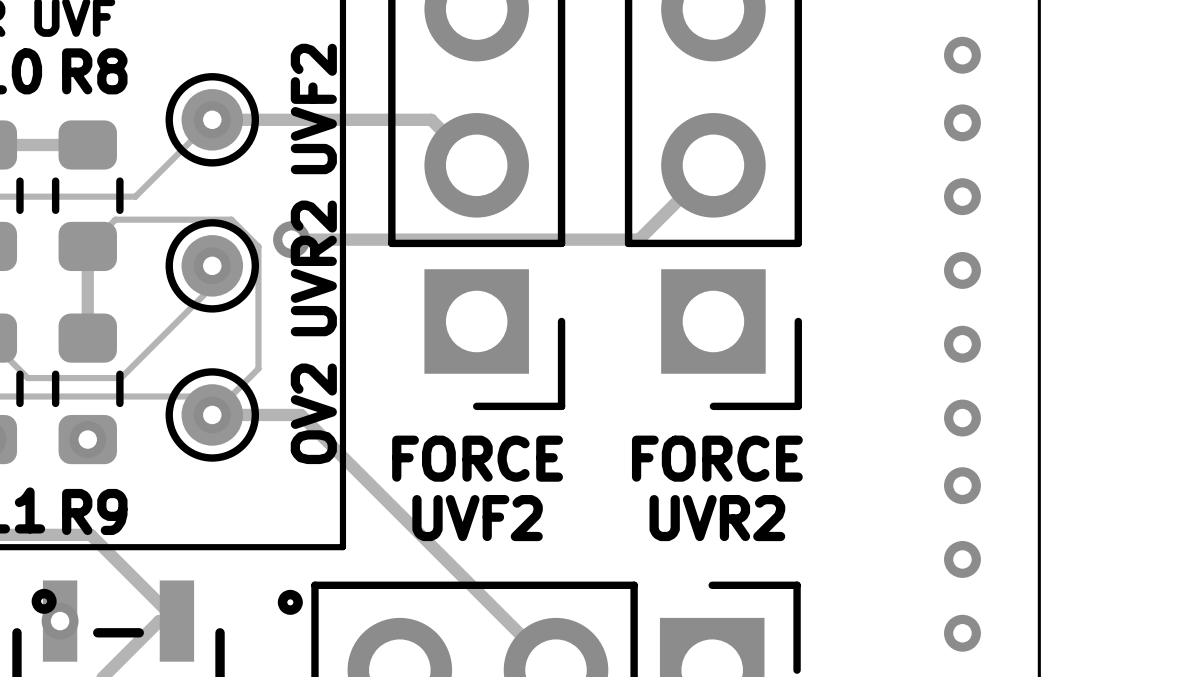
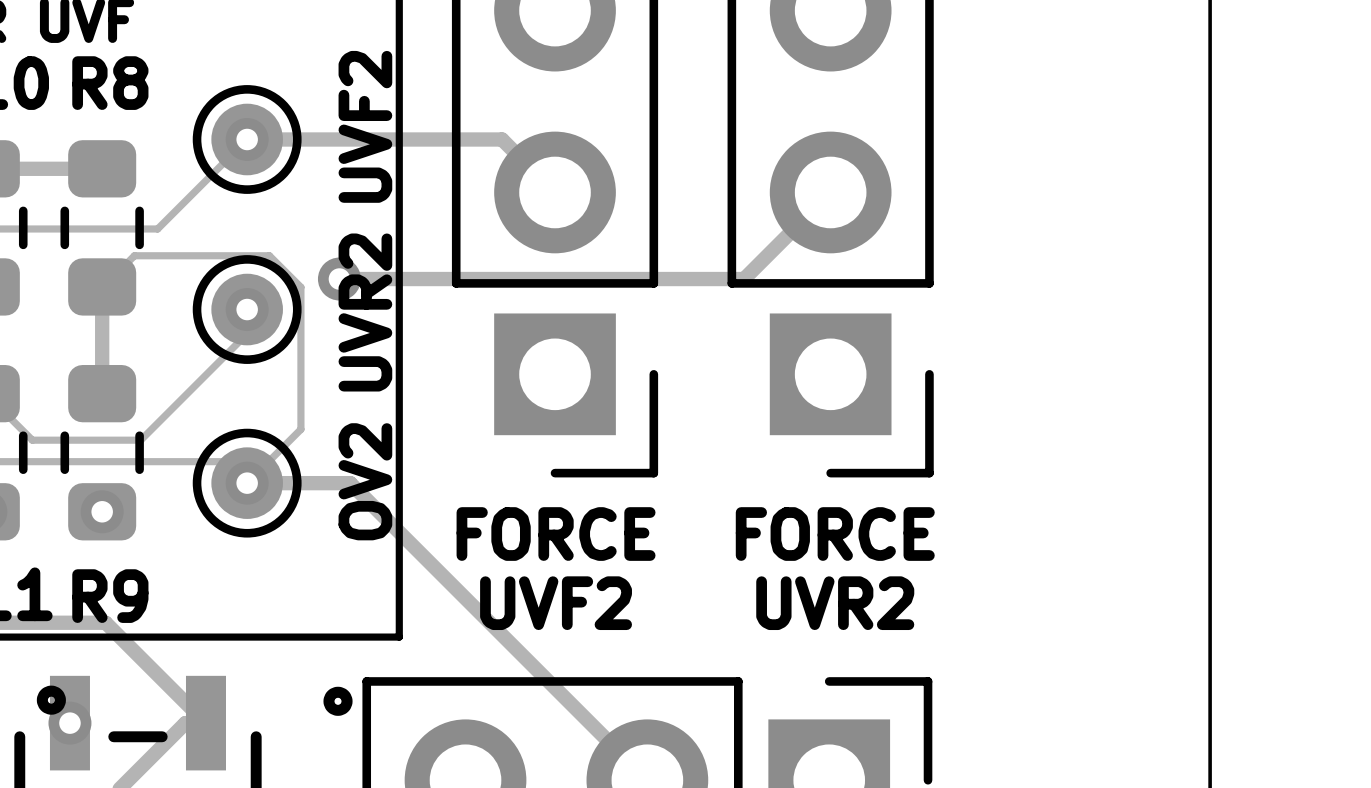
via: (962, 55) -> none
via: (962, 122) -> none
via: (962, 196) -> none
via: (962, 270) -> none
via: (962, 344) -> none
via: (962, 418) -> none
via: (962, 485) -> none
via: (962, 559) -> none
via: (962, 633) -> none

